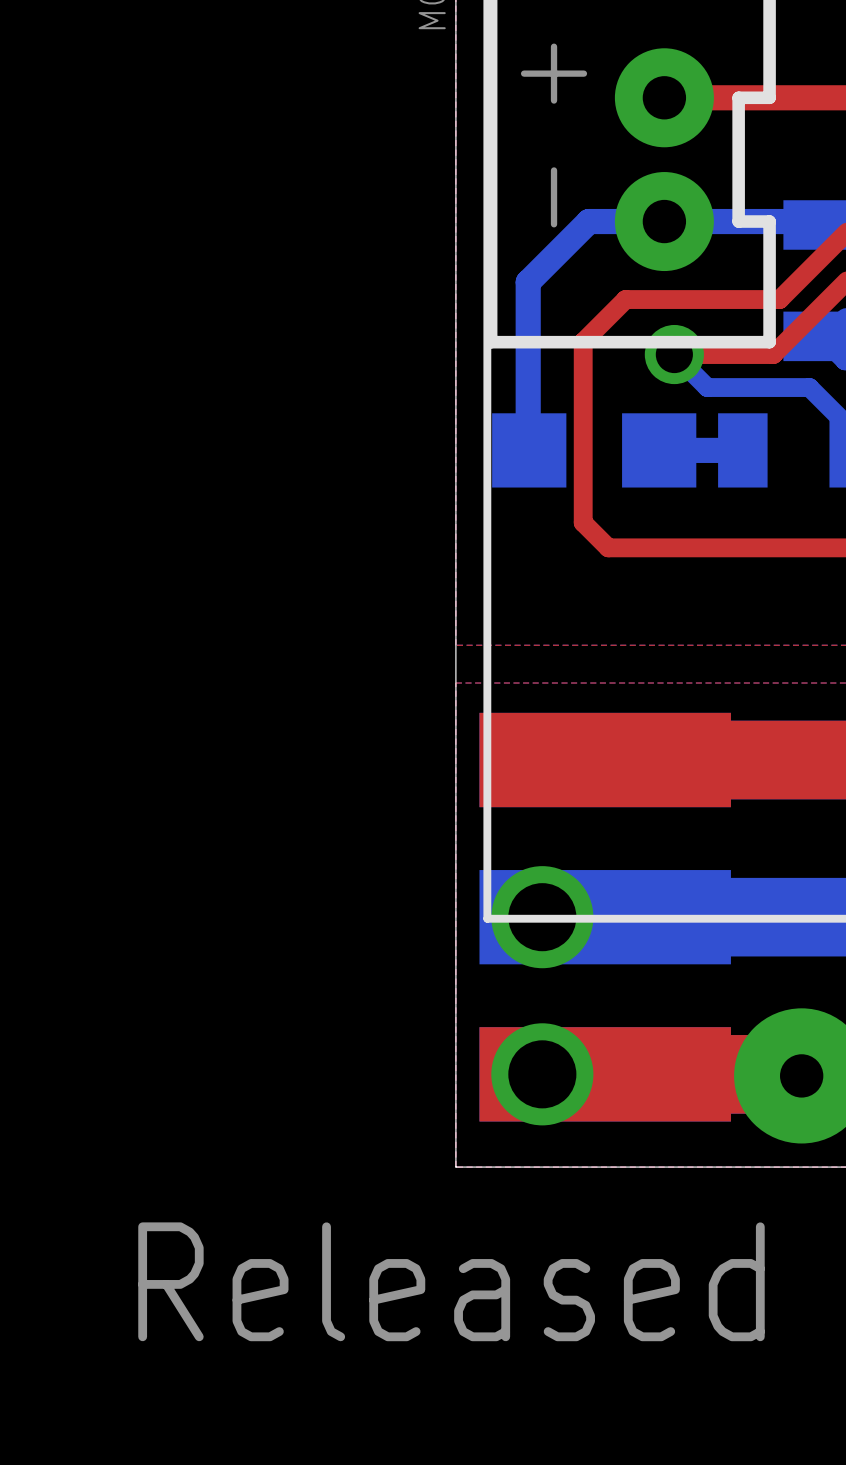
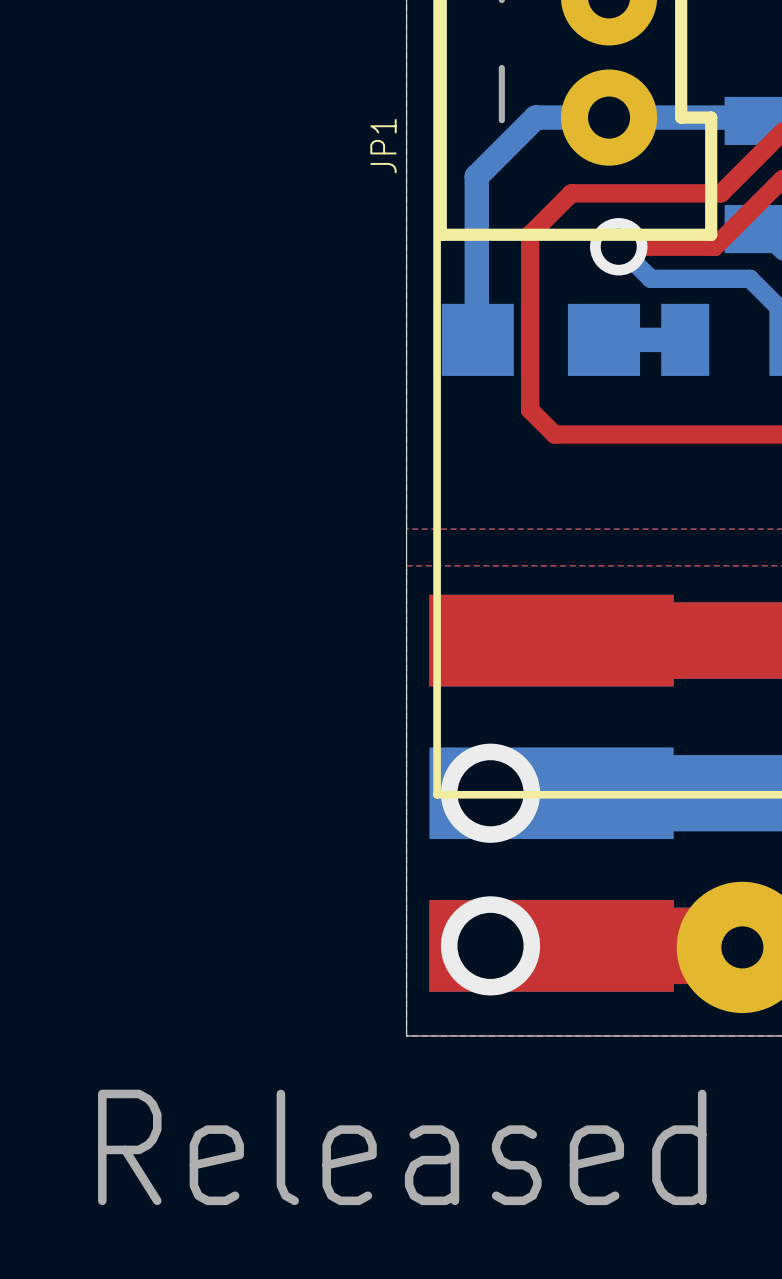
JP1 name: none -> JP1 (383, 146)

